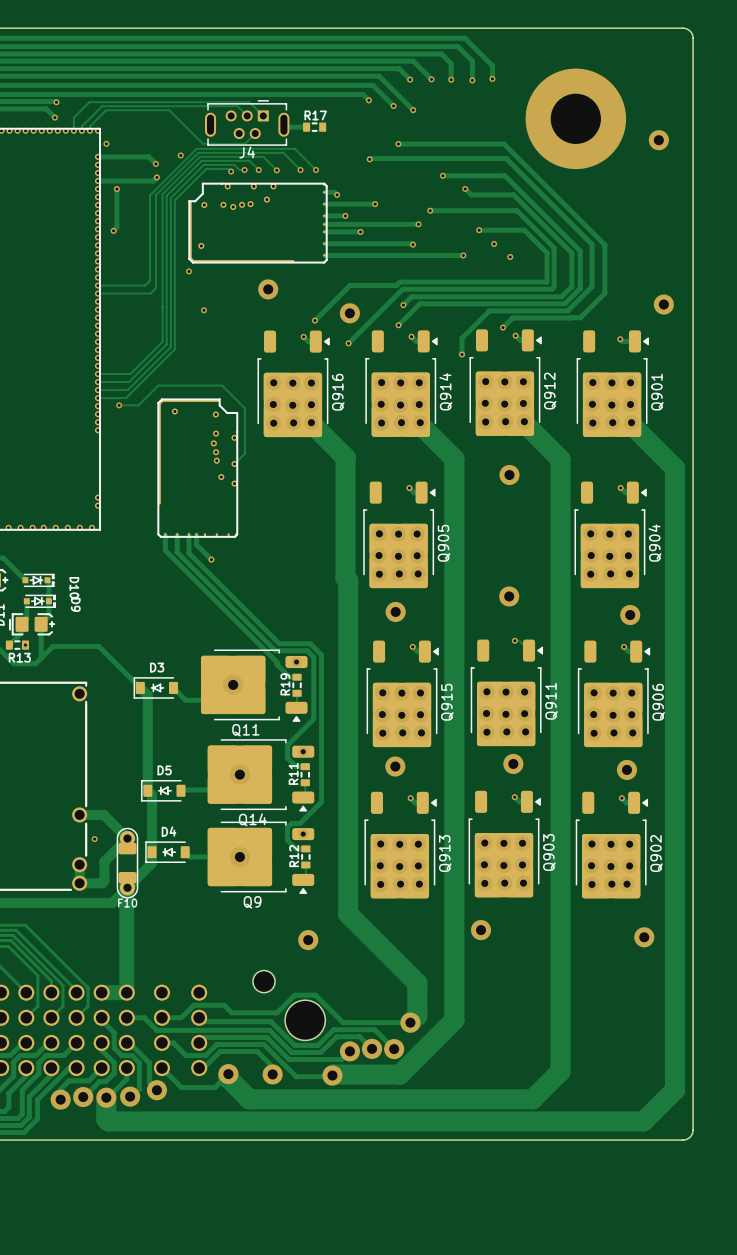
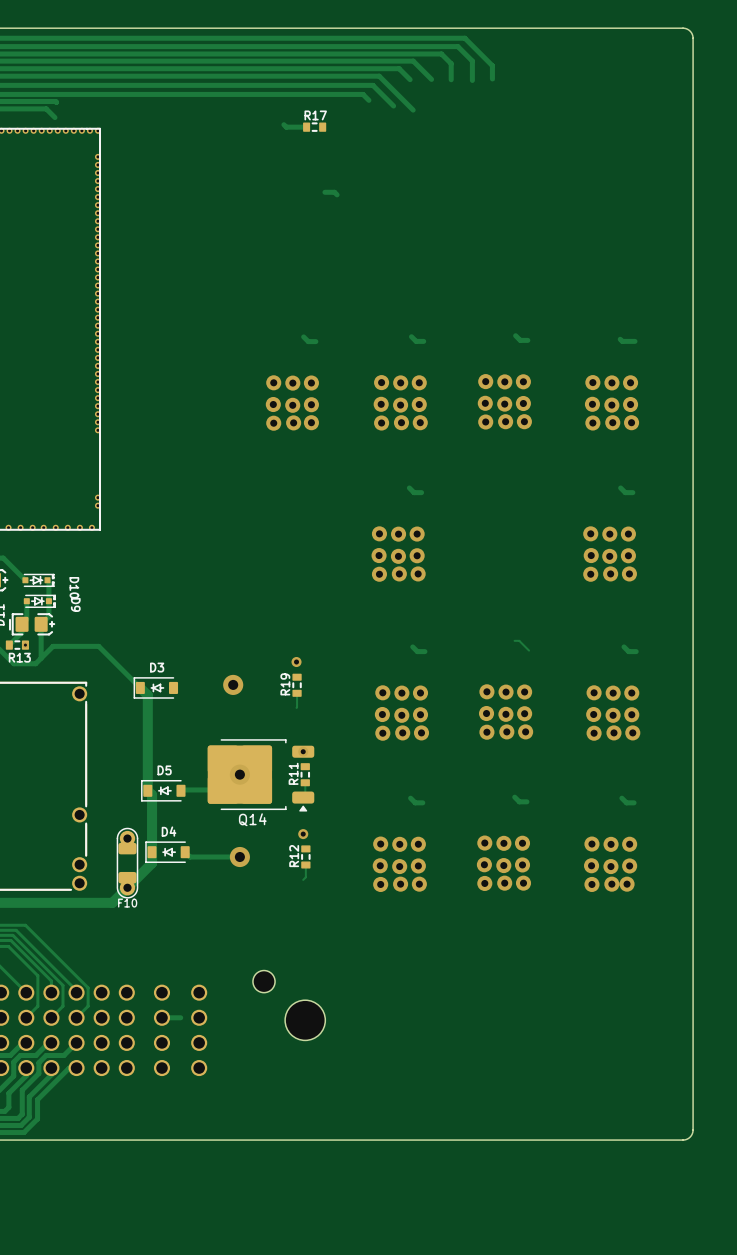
via: (492, 78) -> none
via: (410, 79) -> none
via: (431, 79) -> none
via: (451, 79) -> none
via: (472, 80) -> none
via: (368, 100) -> none
via: (56, 102) -> none
via: (393, 106) -> none
via: (413, 110) -> none
track: (247, 115) (237, 106) (102, 106) (81, 126) (81, 130) -> none
track: (263, 115) (249, 102) (89, 102) (73, 117) (73, 130) -> none
via: (54, 117) -> none
via: (575, 118) -> none
J4: (247, 122) -> none
track: (89, 130) (89, 126) (106, 110) (169, 110) (202, 143) (244, 143) (255, 133) -> none
via: (658, 140) -> none
via: (106, 143) -> none
track: (398, 144) (503, 144) (604, 244) (604, 293) (580, 317) (512, 317) (503, 327) -> none
via: (398, 144) -> none
via: (180, 155) -> none
track: (97, 156) (148, 156) (155, 163) -> none
track: (369, 159) (506, 158) (592, 244) (592, 286) (567, 310) (489, 310) (462, 338) (462, 354) -> none
via: (369, 159) -> none
via: (155, 163) -> none
track: (244, 169) (239, 169) (234, 164) (203, 164) (170, 197) (170, 347) (127, 390) (97, 390) -> none
via: (244, 169) -> none
track: (258, 169) (249, 160) (201, 160) (166, 195) (166, 344) (129, 382) (97, 382) -> none
via: (258, 169) -> none
track: (300, 169) (283, 152) (198, 152) (155, 195) (155, 288) (150, 293) (97, 293) -> none
via: (300, 169) -> none
track: (315, 169) (294, 148) (196, 148) (150, 195) (150, 280) (145, 285) (97, 285) -> none
via: (315, 169) -> none
track: (276, 170) (263, 156) (199, 156) (162, 194) (162, 341) (130, 374) (97, 374) -> none
via: (276, 170) -> none
track: (231, 171) (228, 168) (206, 168) (174, 200) (174, 349) (126, 398) (97, 398) -> none
via: (231, 171) -> none
track: (442, 175) (504, 175) (580, 251) (580, 288) (564, 303) (419, 303) (398, 325) -> none
via: (442, 175) -> none
track: (156, 177) (153, 181) (97, 181) -> none
via: (156, 177) -> none
track: (465, 188) (471, 194) (513, 194) (571, 253) (571, 286) (561, 296) (411, 296) (403, 305) -> none
via: (465, 188) -> none
track: (116, 189) (116, 227) (113, 230) -> none
via: (116, 189) -> none
via: (337, 194) -> none
track: (324, 204) (375, 204) -> none
via: (375, 204) -> none
track: (430, 210) (516, 210) (554, 247) (554, 287) (552, 289) (402, 289) (348, 343) -> none
via: (430, 210) -> none
track: (324, 215) (345, 215) -> none
via: (345, 215) -> none
part: (258, 223) -> none
track: (324, 224) (418, 224) -> none
via: (418, 224) -> none
via: (113, 230) -> none
track: (479, 230) (524, 230) (547, 252) (547, 282) (399, 282) (396, 285) (350, 285) (315, 320) -> none
via: (479, 230) -> none
track: (324, 231) (360, 231) -> none
via: (360, 231) -> none
track: (324, 243) (412, 244) -> none
via: (494, 243) -> none
via: (412, 244) -> none
track: (324, 255) (463, 255) -> none
via: (463, 255) -> none
via: (510, 257) -> none
via: (188, 271) -> none
via: (268, 289) -> none
via: (663, 304) -> none
via: (403, 305) -> none
via: (204, 310) -> none
via: (349, 313) -> none
via: (315, 320) -> none
via: (398, 325) -> none
via: (503, 327) -> none
via: (515, 335) -> none
via: (303, 336) -> none
via: (411, 336) -> none
via: (620, 339) -> none
via: (348, 343) -> none
via: (462, 354) -> none
Q912: (505, 382) -> none
Q916: (293, 383) -> none
Q914: (401, 383) -> none
Q901: (612, 383) -> none
track: (504, 403) (560, 459) (560, 1071) (532, 1099) (249, 1099) (228, 1078) (228, 1074) (214, 1087) (181, 1087) (161, 1068) -> none
track: (292, 404) (345, 457) (345, 578) (348, 580) (348, 914) (417, 983) (417, 1015) (410, 1022) (343, 1022) (315, 995) (294, 995) (277, 1012) (231, 1012) (224, 1005) (193, 1005) (181, 1017) -> none
track: (400, 404) (454, 458) (454, 1020) (399, 1074) (296, 1076) (264, 1044) (216, 1044) (205, 1055) (185, 1055) (173, 1042) (161, 1043) -> none
track: (611, 404) (674, 468) (674, 1090) (643, 1121) (108, 1121) (106, 1119) (106, 1099) (126, 1079) (126, 1068) -> none
track: (119, 405) (138, 405) (158, 385) (222, 385) (244, 408) (244, 453) (234, 463) -> none
via: (119, 405) -> none
part: (197, 468) -> none
via: (509, 474) -> none
via: (409, 487) -> none
via: (620, 487) -> none
Q905: (399, 534) -> none
Q904: (610, 534) -> none
track: (165, 535) (165, 550) (277, 662) (277, 664) (289, 677) (297, 677) -> none
track: (177, 535) (177, 552) (275, 650) (307, 650) (313, 657) (313, 719) (287, 745) (287, 758) (296, 766) (305, 766) -> none
track: (189, 535) (189, 553) (279, 643) (310, 643) (321, 655) (321, 801) (300, 823) (291, 823) (287, 827) (287, 840) (295, 848) (305, 848) -> none
track: (196, 535) (196, 544) (211, 559) -> none
via: (211, 559) -> none
via: (509, 596) -> none
via: (395, 611) -> none
via: (630, 615) -> none
via: (514, 640) -> none
via: (412, 646) -> none
via: (624, 646) -> none
Q11: (254, 685) -> none
track: (173, 687) (185, 700) (216, 700) -> none
Q911: (506, 692) -> none
Q915: (402, 693) -> none
Q906: (614, 693) -> none
via: (513, 763) -> none
via: (395, 766) -> none
via: (626, 769) -> none
via: (514, 797) -> none
via: (410, 798) -> none
via: (621, 798) -> none
track: (79, 814) (103, 814) (127, 838) (104, 861) (104, 880) (102, 883) (79, 883) (79, 864) -> none
via: (94, 839) -> none
Q903: (504, 844) -> none
Q913: (400, 845) -> none
Q902: (611, 845) -> none
Q9: (261, 857) -> none
track: (126, 884) (126, 992) (101, 992) -> none
via: (481, 930) -> none
via: (644, 937) -> none
via: (308, 940) -> none
track: (101, 1017) (101, 1020) (114, 1032) (114, 1048) (121, 1055) (132, 1055) (139, 1062) (139, 1089) (130, 1098) (130, 1101) -> none
track: (126, 1017) (144, 1017) (156, 1030) (269, 1030) (291, 1052) (320, 1052) (336, 1036) (359, 1036) (372, 1048) (366, 1051) -> none
track: (199, 1017) (203, 1021) (271, 1021) (294, 1045) (317, 1045) (333, 1029) (374, 1029) (394, 1049) -> none
via: (410, 1022) -> none
track: (101, 1042) (101, 1050) (114, 1062) (114, 1073) (105, 1081) (99, 1081) (82, 1098) -> none
track: (126, 1042) (129, 1042) (149, 1062) (149, 1082) (156, 1090) (156, 1097) -> none
track: (199, 1042) (204, 1037) (266, 1037) (288, 1059) (341, 1059) (349, 1051) -> none
via: (372, 1048) -> none
via: (394, 1049) -> none
via: (349, 1051) -> none
track: (199, 1068) (203, 1068) (220, 1051) (257, 1051) (272, 1066) (272, 1074) -> none
track: (101, 1070) (101, 1068) (88, 1080) (68, 1080) (60, 1089) (60, 1099) -> none
via: (228, 1074) -> none
via: (272, 1074) -> none
via: (332, 1075) -> none
via: (156, 1090) -> none
via: (130, 1096) -> none
via: (83, 1097) -> none
via: (106, 1097) -> none
via: (60, 1099) -> none

